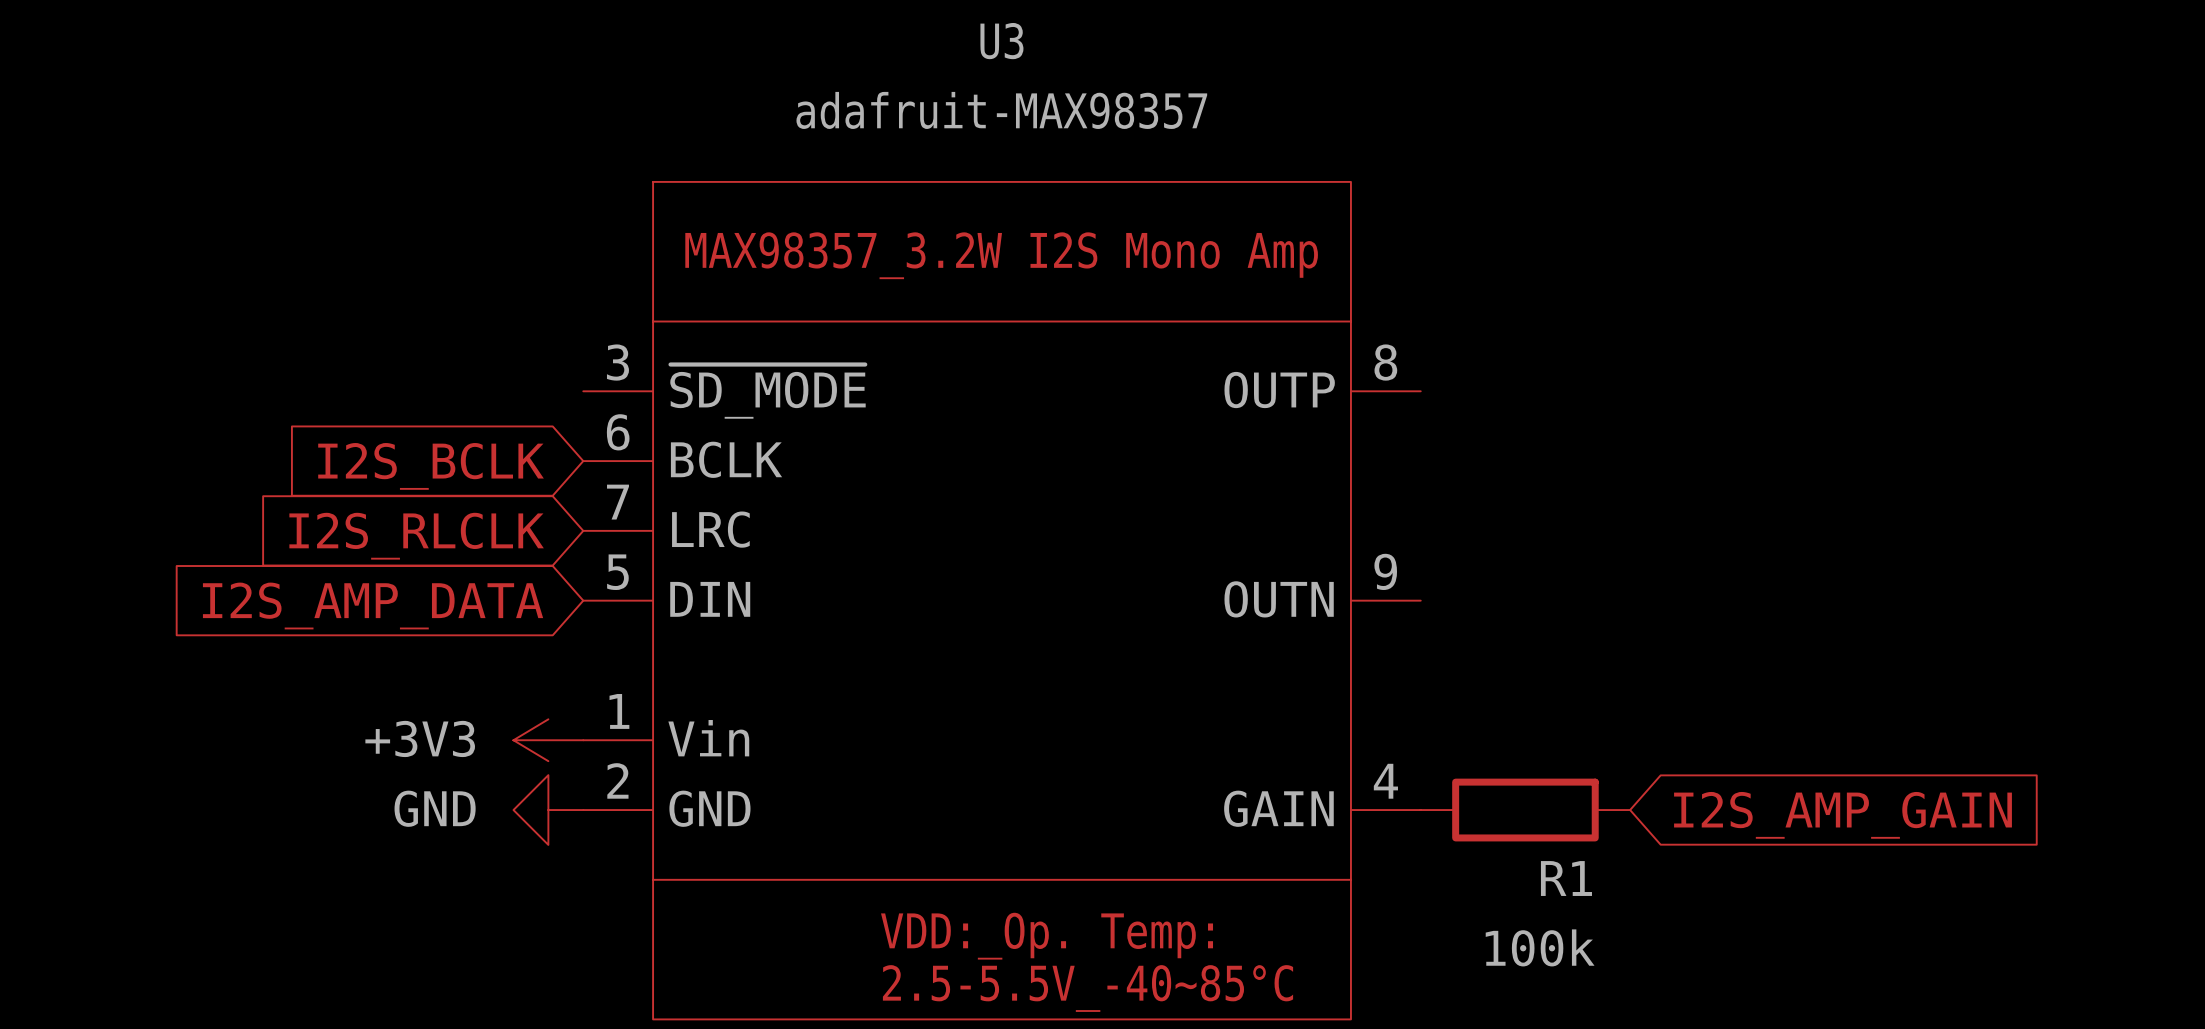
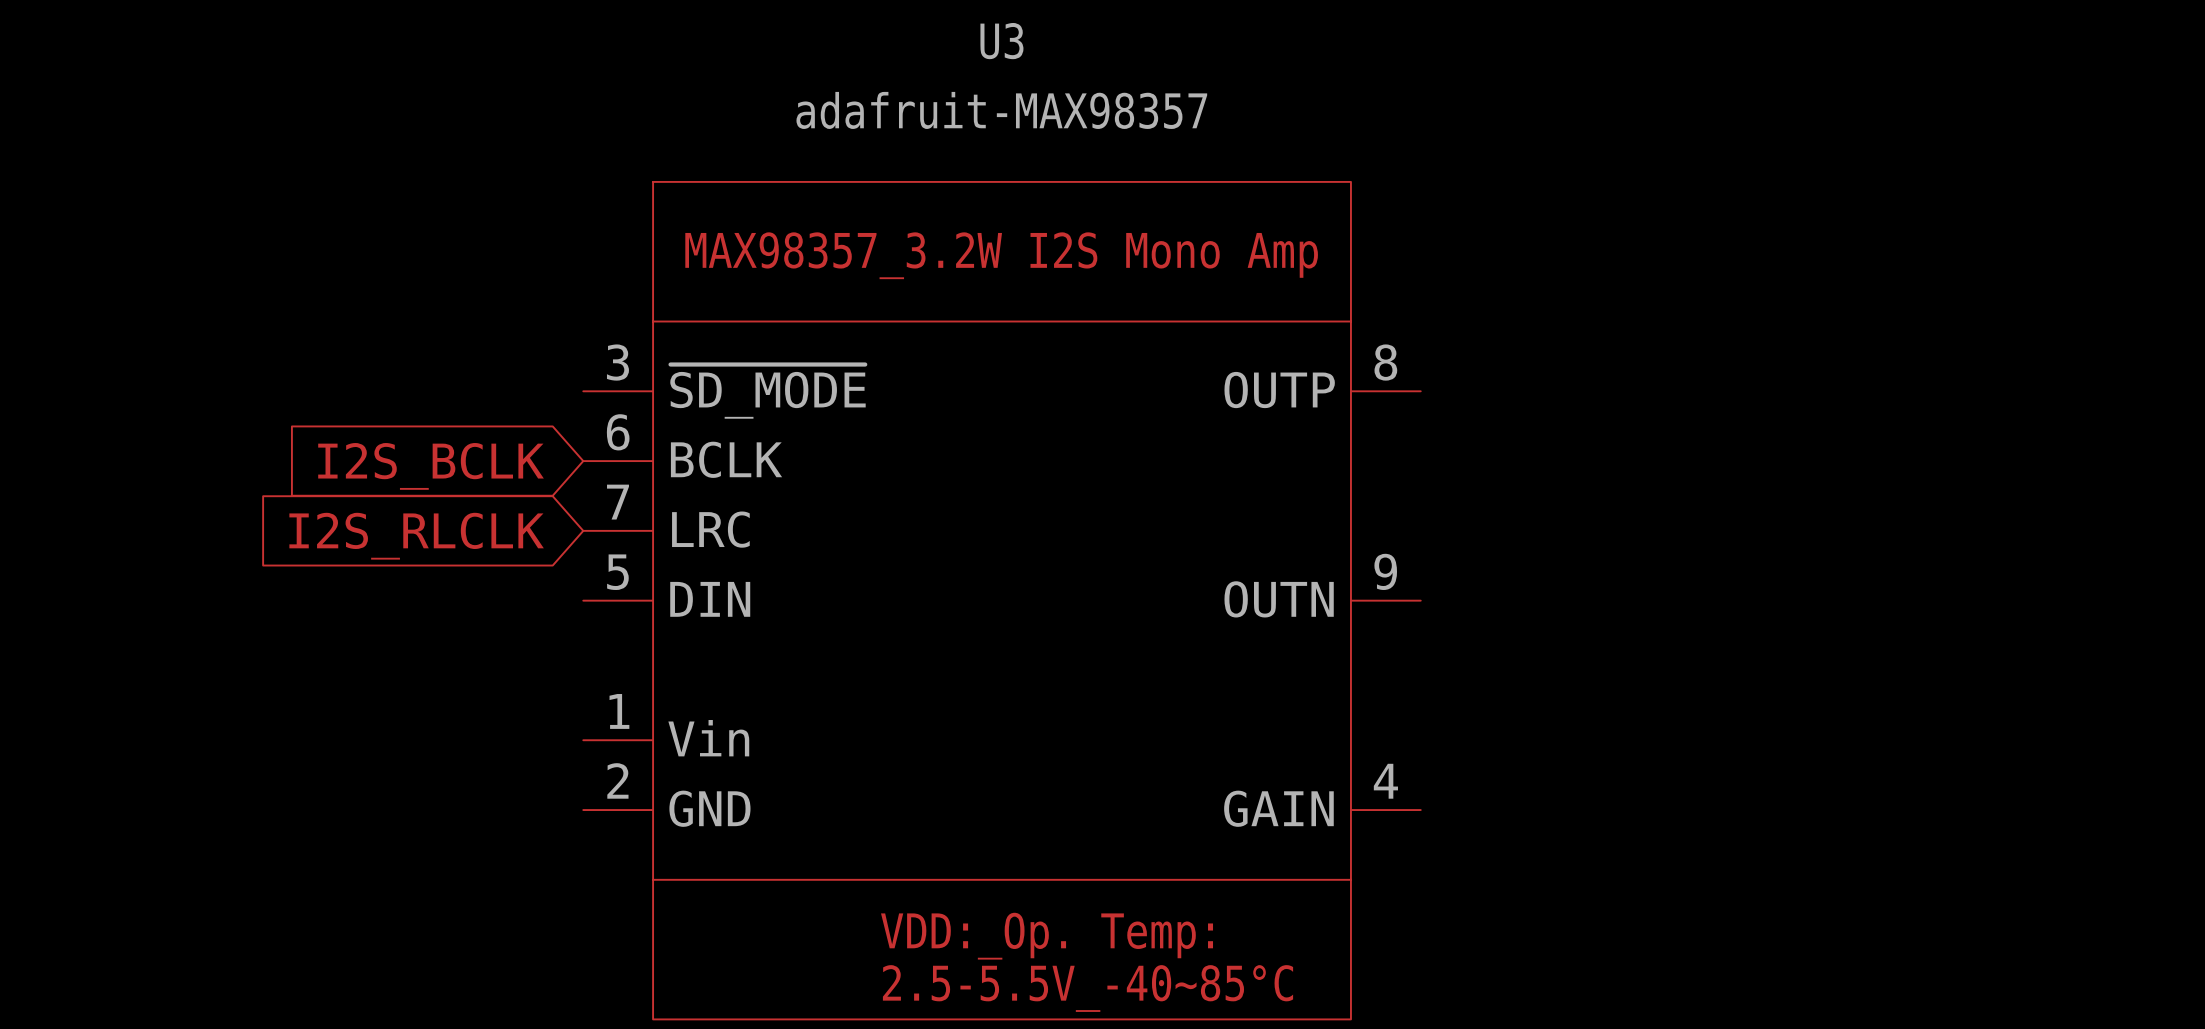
global label: I2S_AMP_DATA (373, 605) -> none
power symbol: +3V3 (548, 740) -> none
power symbol: GND (548, 810) -> none
R1: 100k (1525, 810) -> none
global label: I2S_AMP_GAIN (1843, 815) -> none

